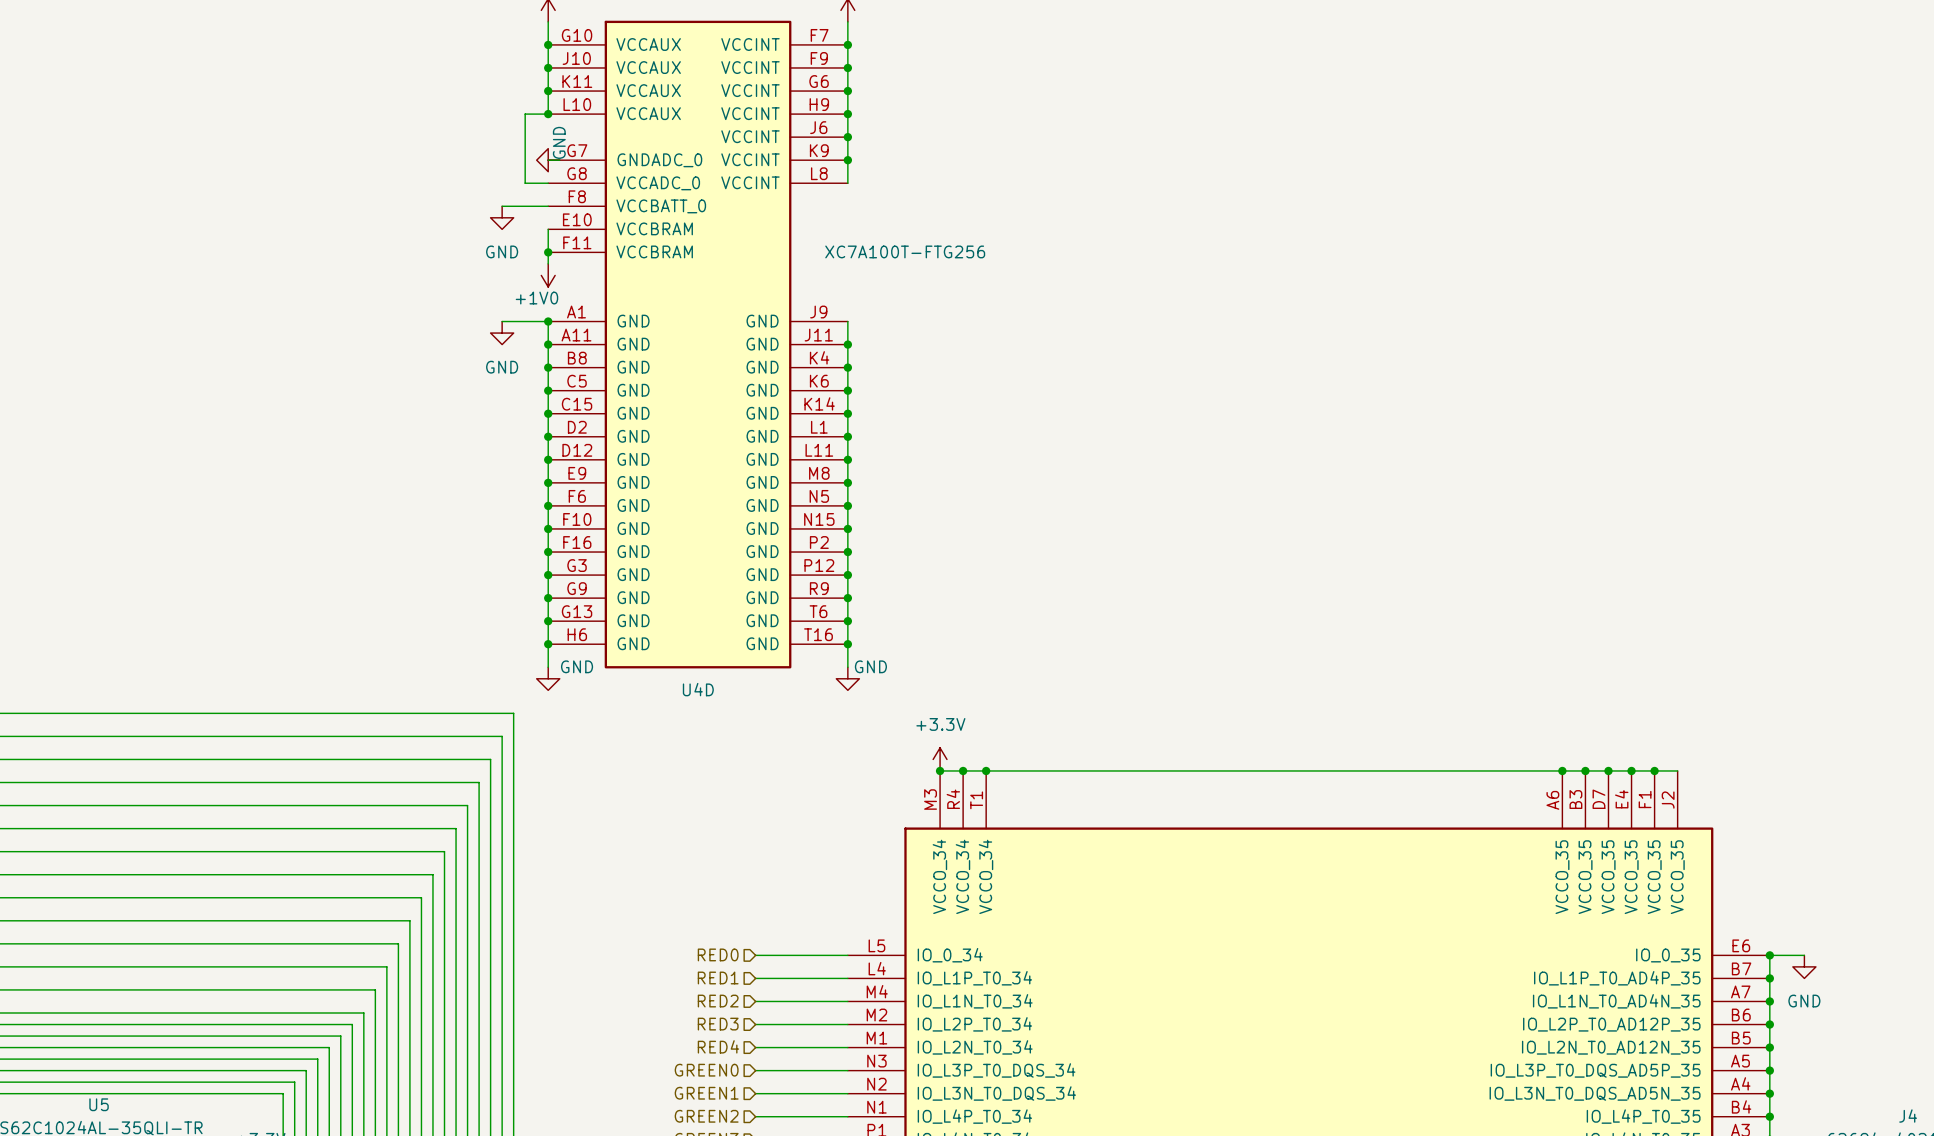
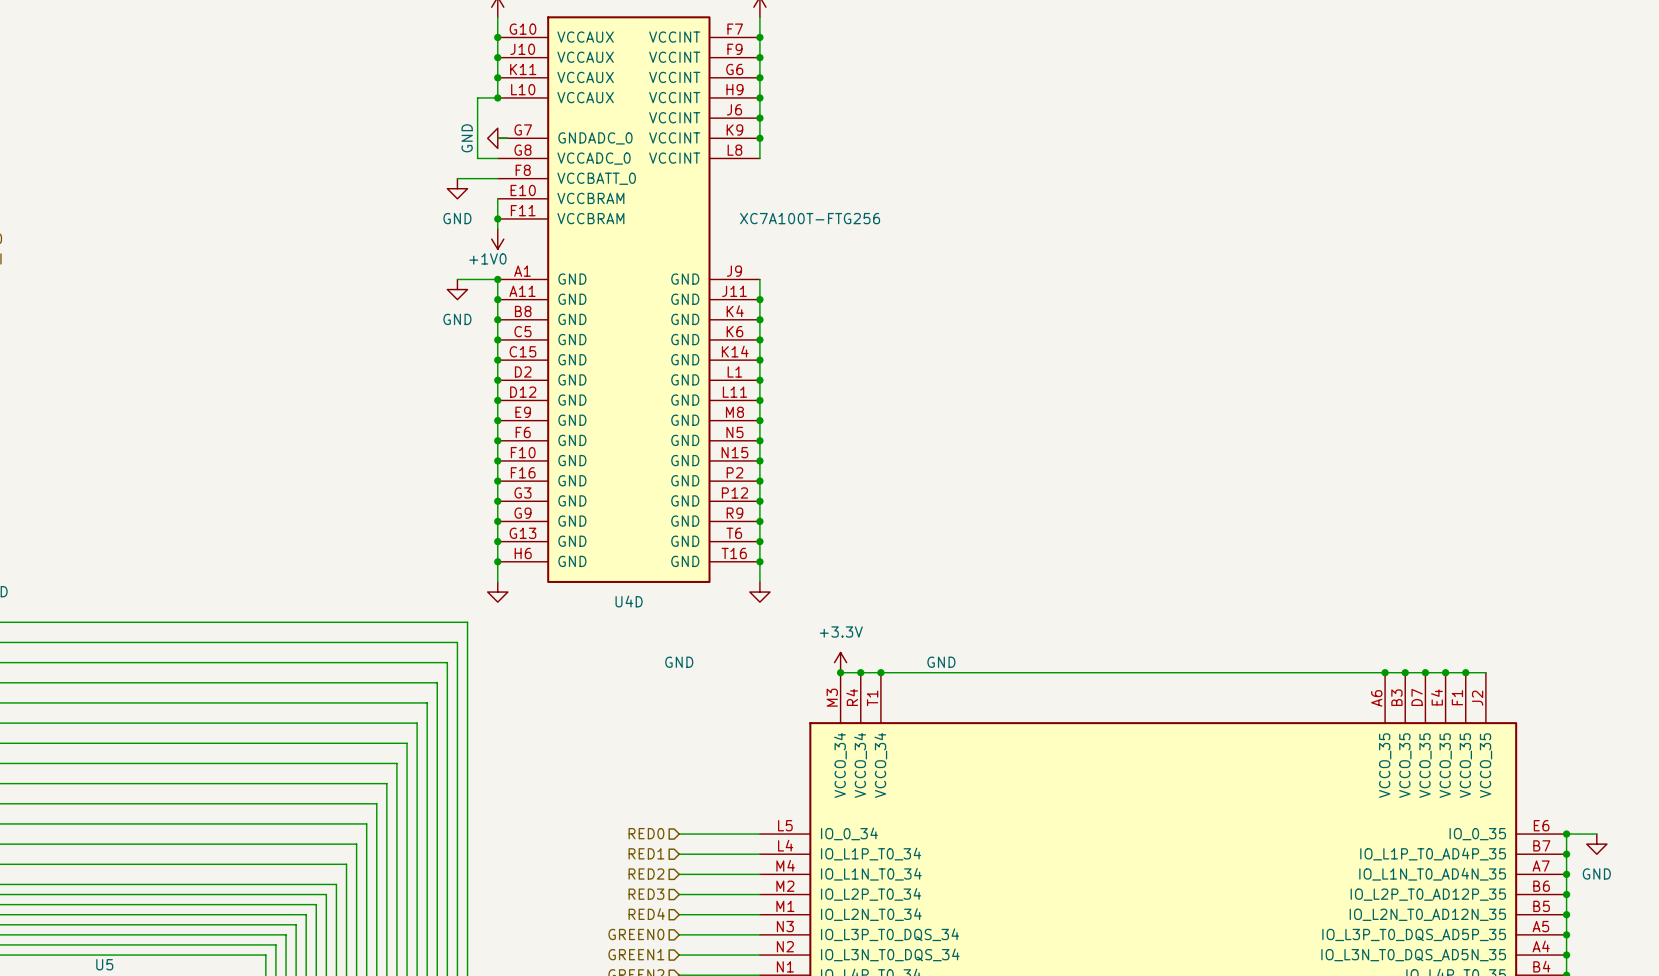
power symbol text position: GND (559, 142) -> GND (467, 138)
power symbol text position: GND (577, 666) -> GND (679, 662)
power symbol text position: GND (870, 666) -> GND (941, 662)

